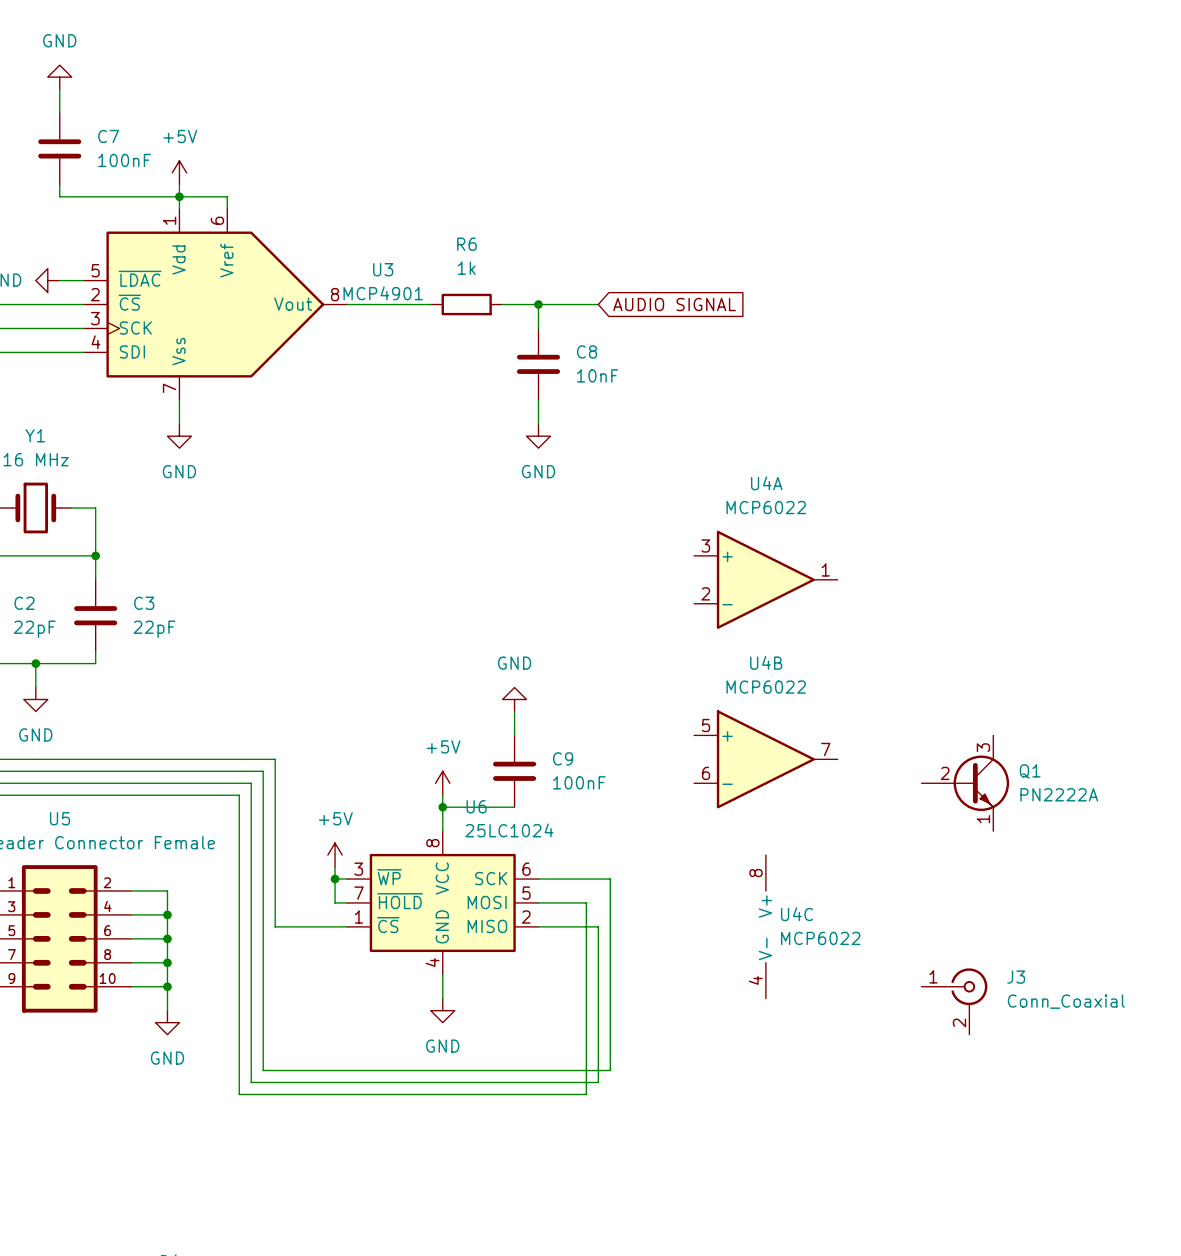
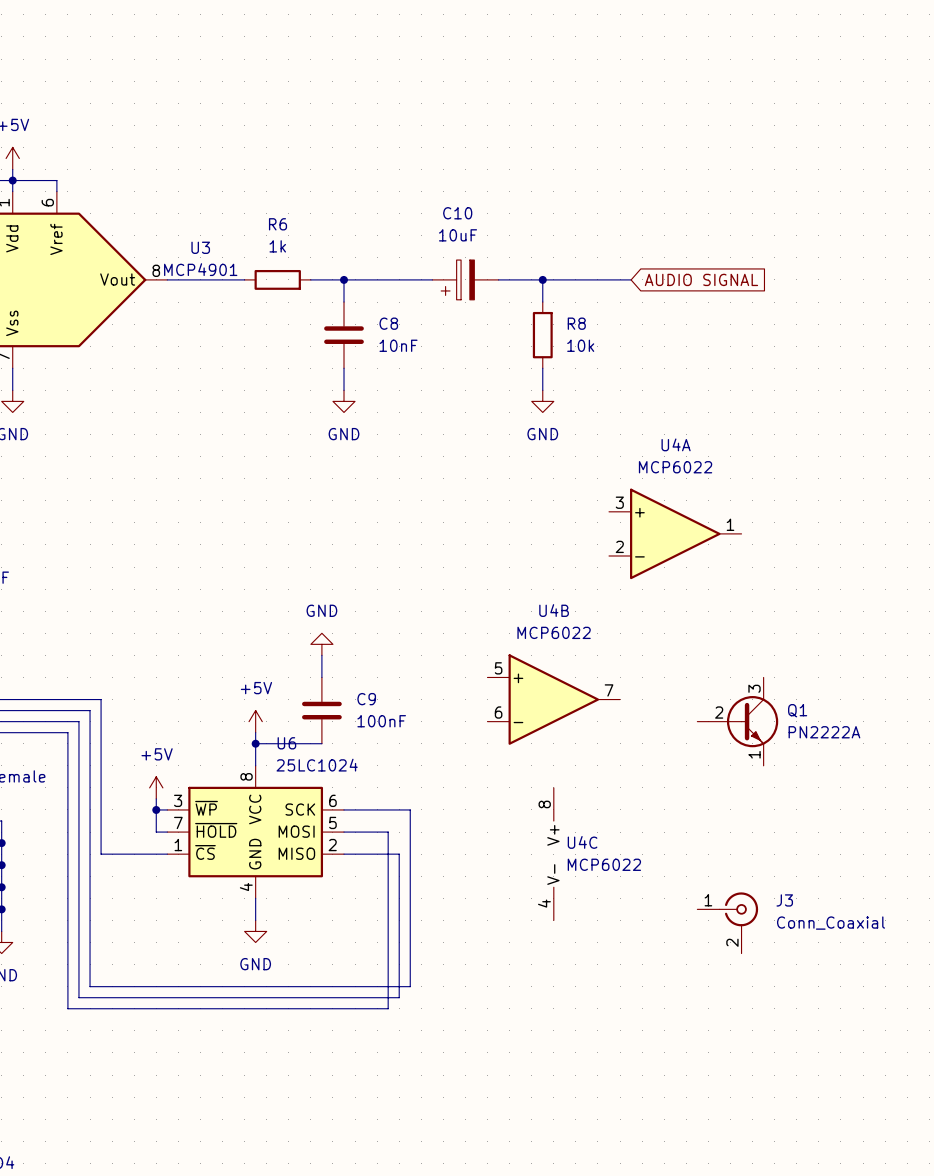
wire: none -> (399, 279) (432, 279)
C10: none -> 10uF (465, 279)
global label: AUDIO SIGNAL (674, 304) -> none
wire: none -> (498, 279) (631, 279)
wire: none -> (542, 279) (542, 302)
junction: none -> (542, 279)
global label: none -> AUDIO SIGNAL (701, 279)
R8: none -> 10k (542, 335)
wire: none -> (542, 368) (542, 390)
power symbol: none -> GND (542, 401)
U4A position: (765, 579) -> (675, 533)

